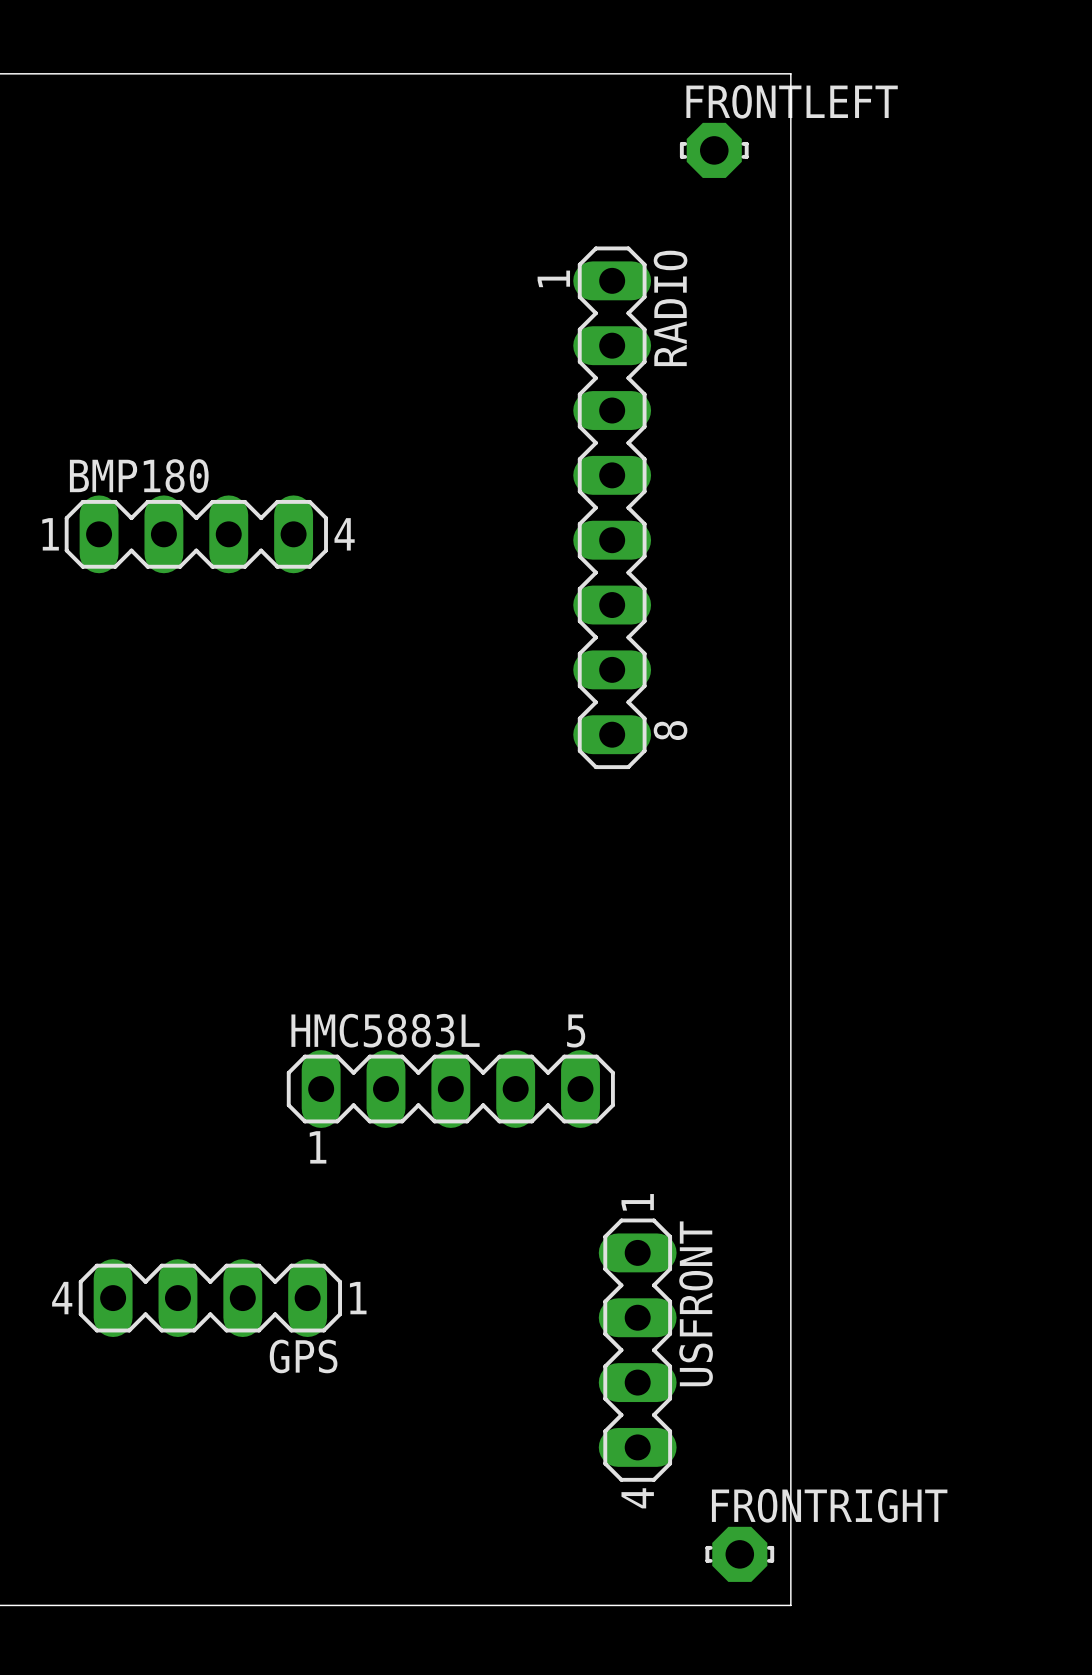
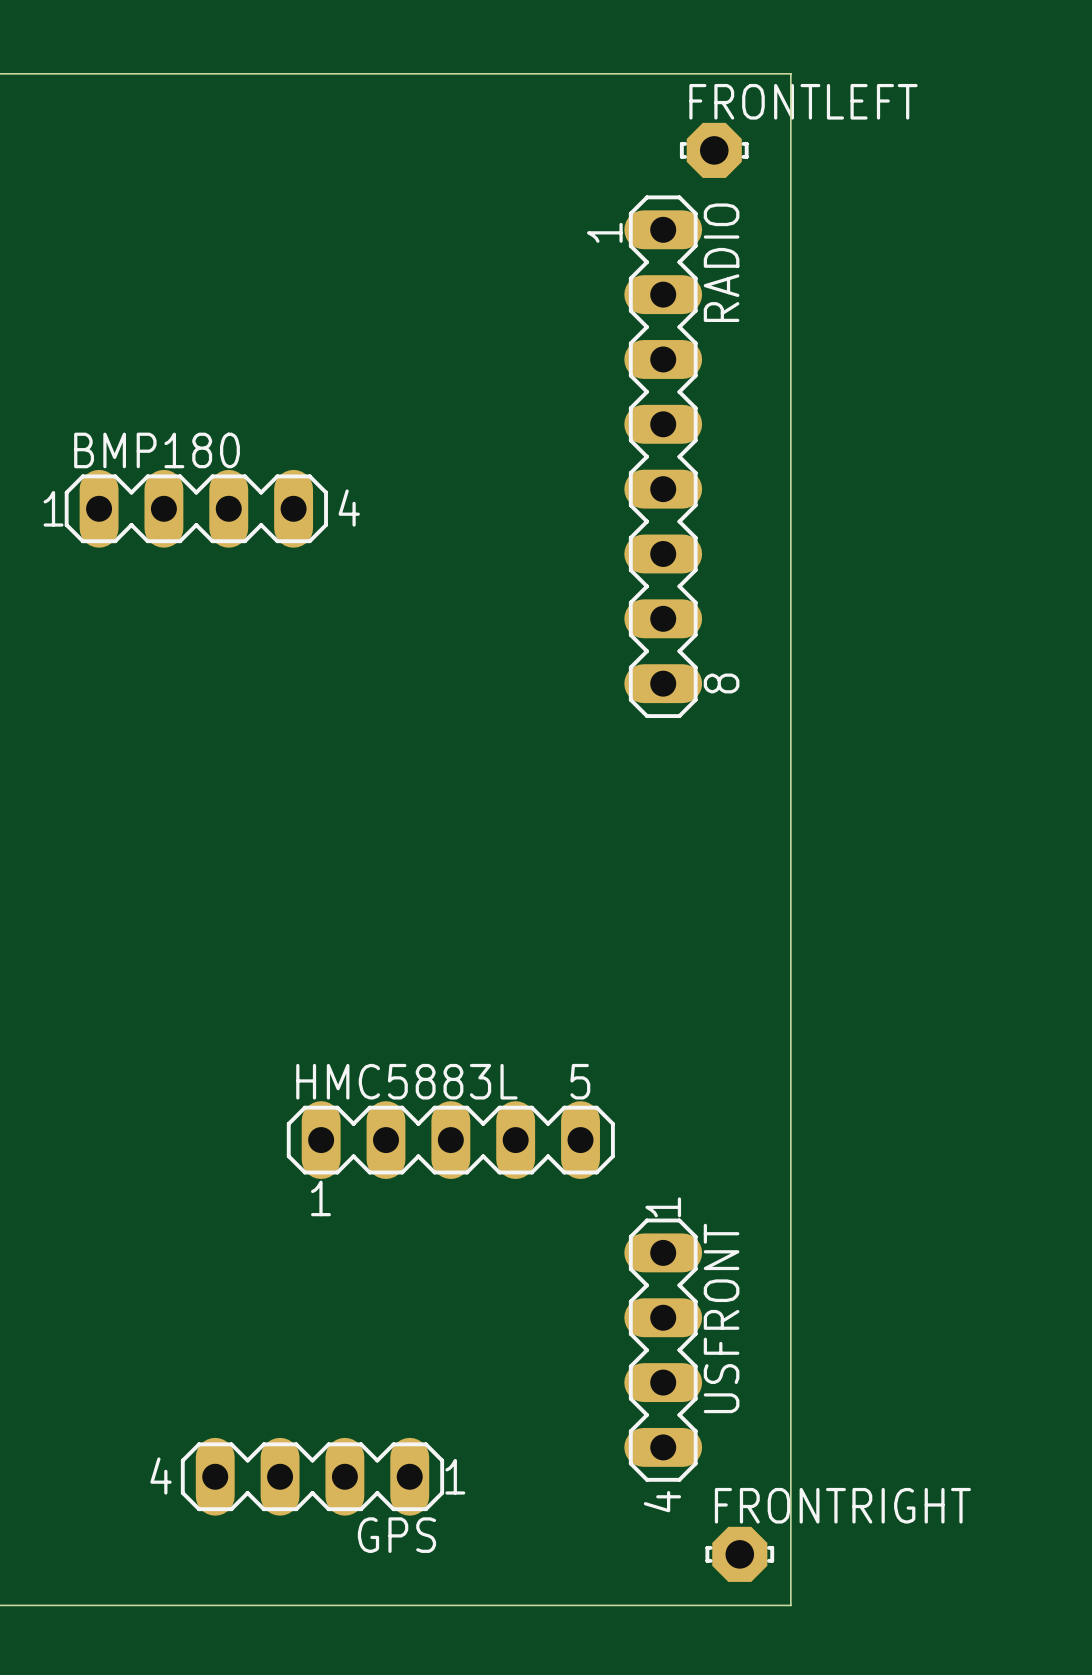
RADIO position: (612, 507) -> (663, 456)
BMP180 position: (196, 534) -> (196, 508)
HMC5883L position: (450, 1089) -> (450, 1140)
GPS position: (210, 1298) -> (312, 1476)
USFRONT position: (637, 1350) -> (663, 1350)

